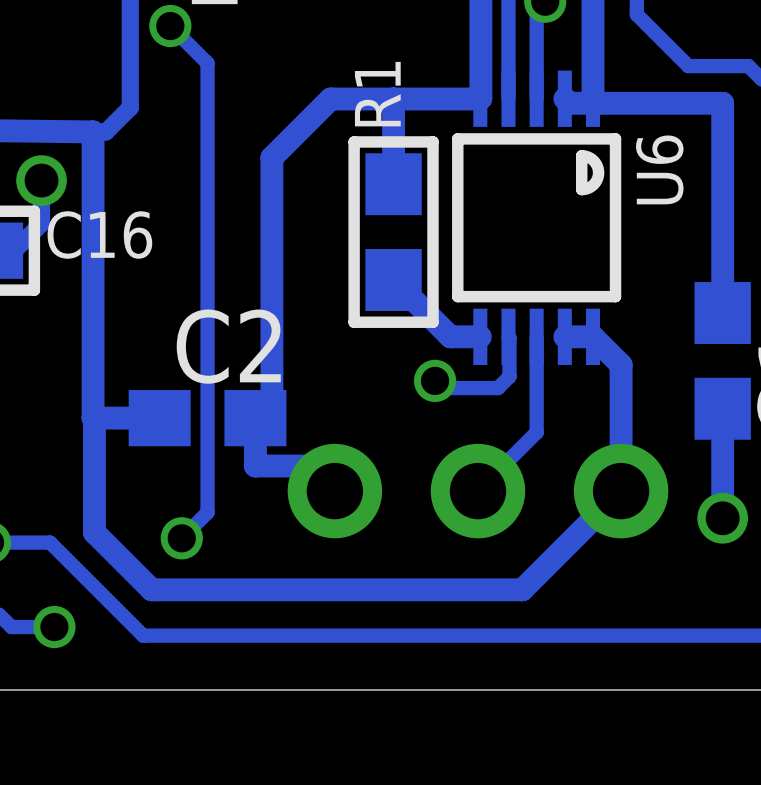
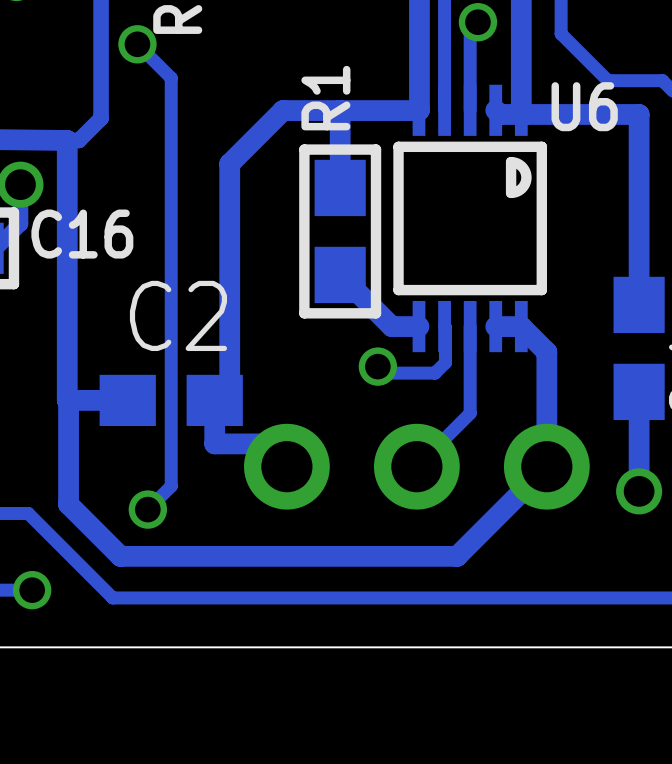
U6 name rotation: 0° (659, 169) -> 90° clockwise (584, 106)
C2 name position: C2 (228, 346) -> C2 (178, 315)

